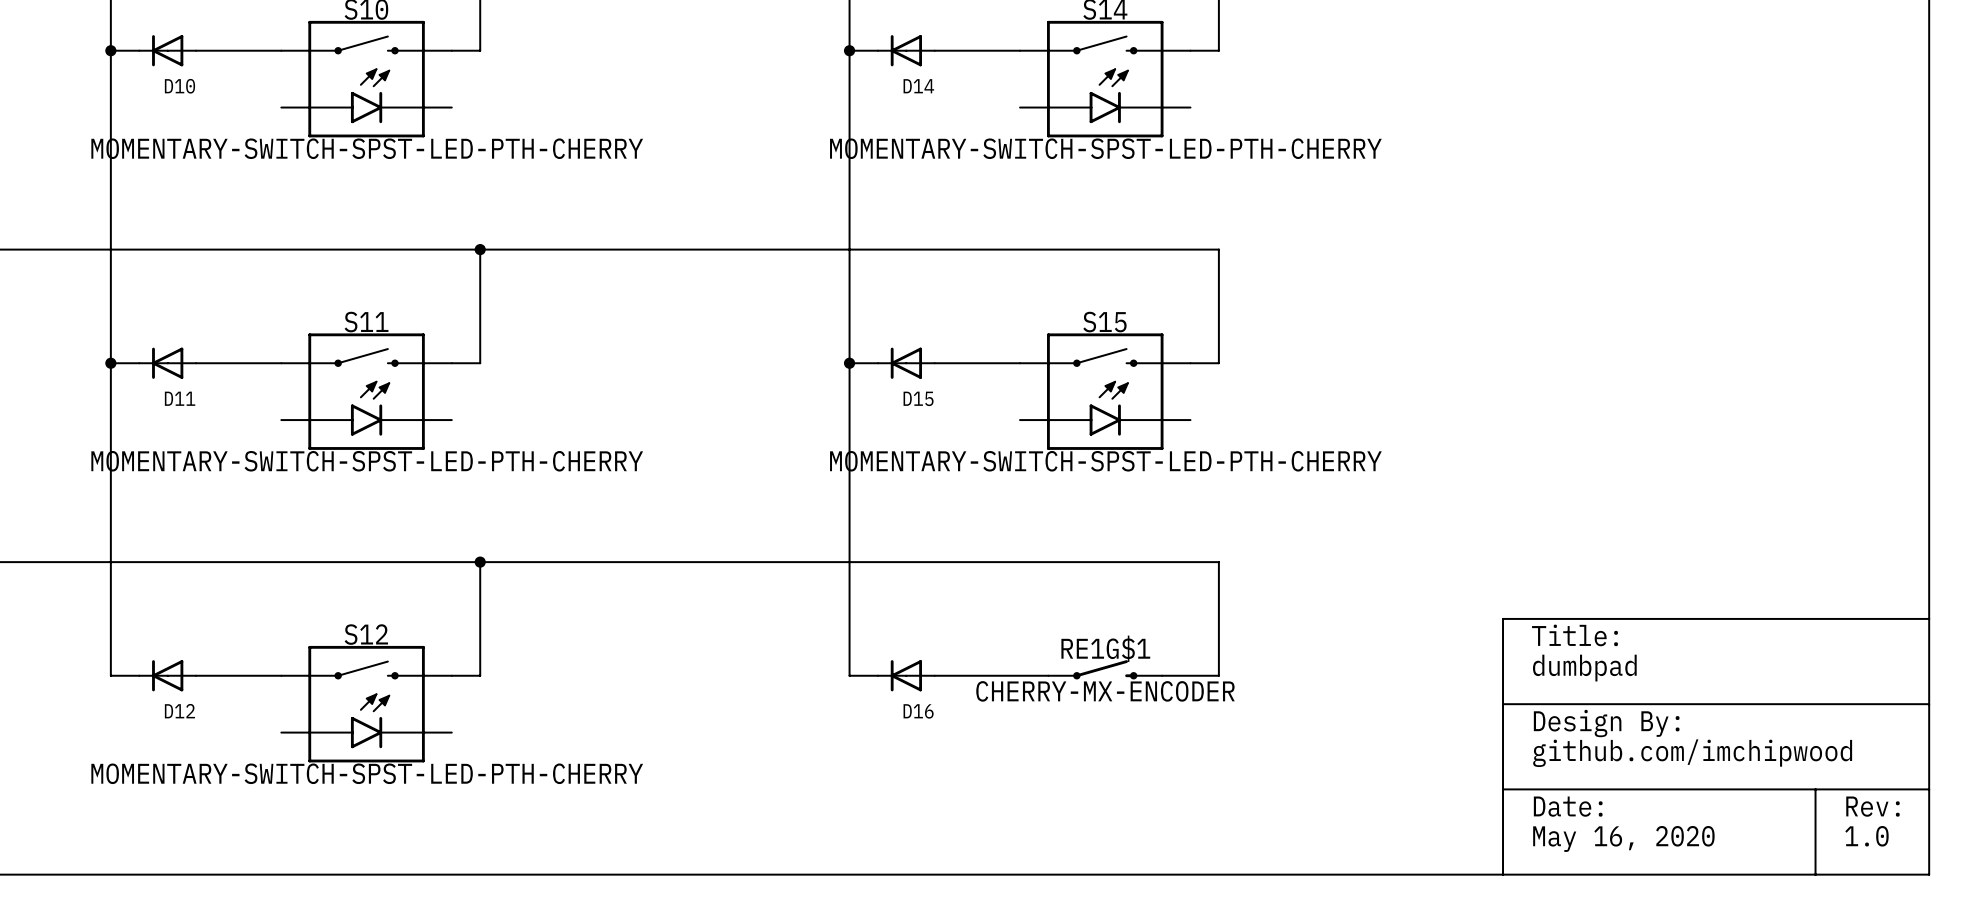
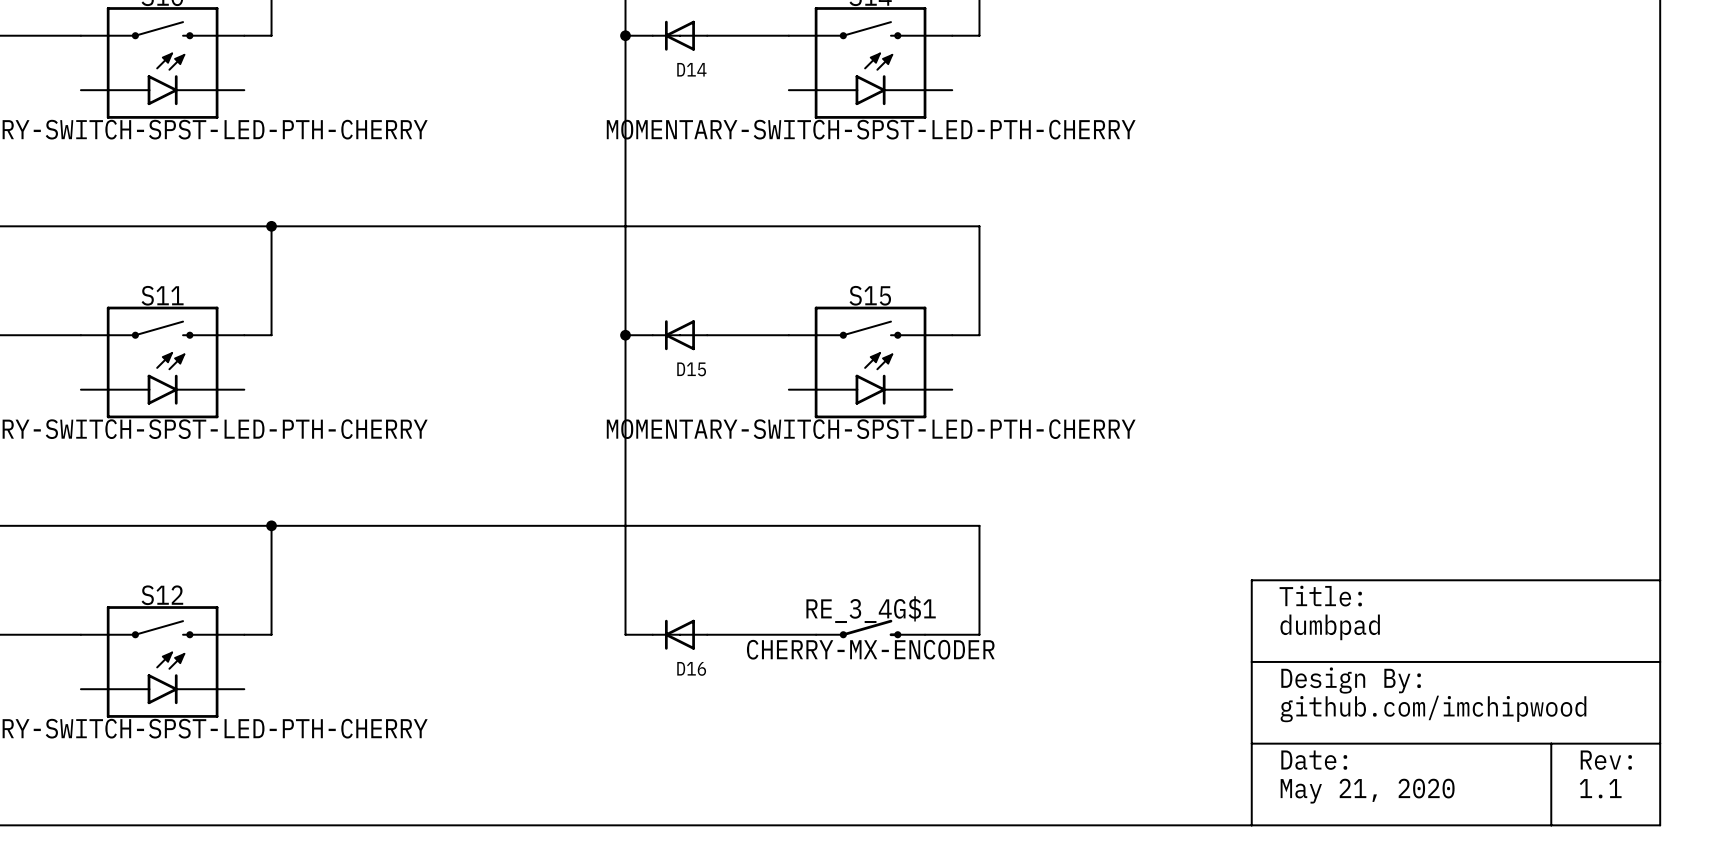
RE1G$1 name: RE1G$1 (1105, 648) -> RE_3_4G$1 (871, 609)
text: 1.0 (1866, 836) -> 1.1 (1600, 788)
text: May 16, 2020 (1623, 838) -> May 21, 2020 (1367, 791)

